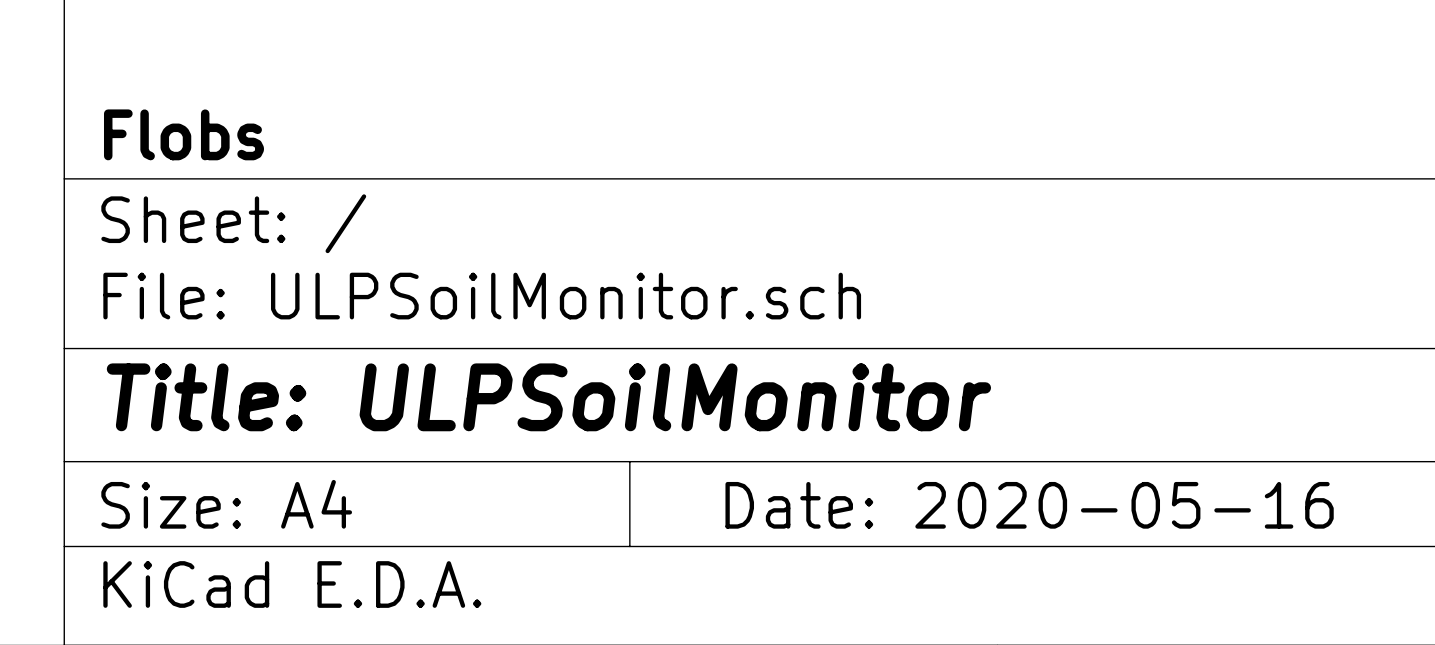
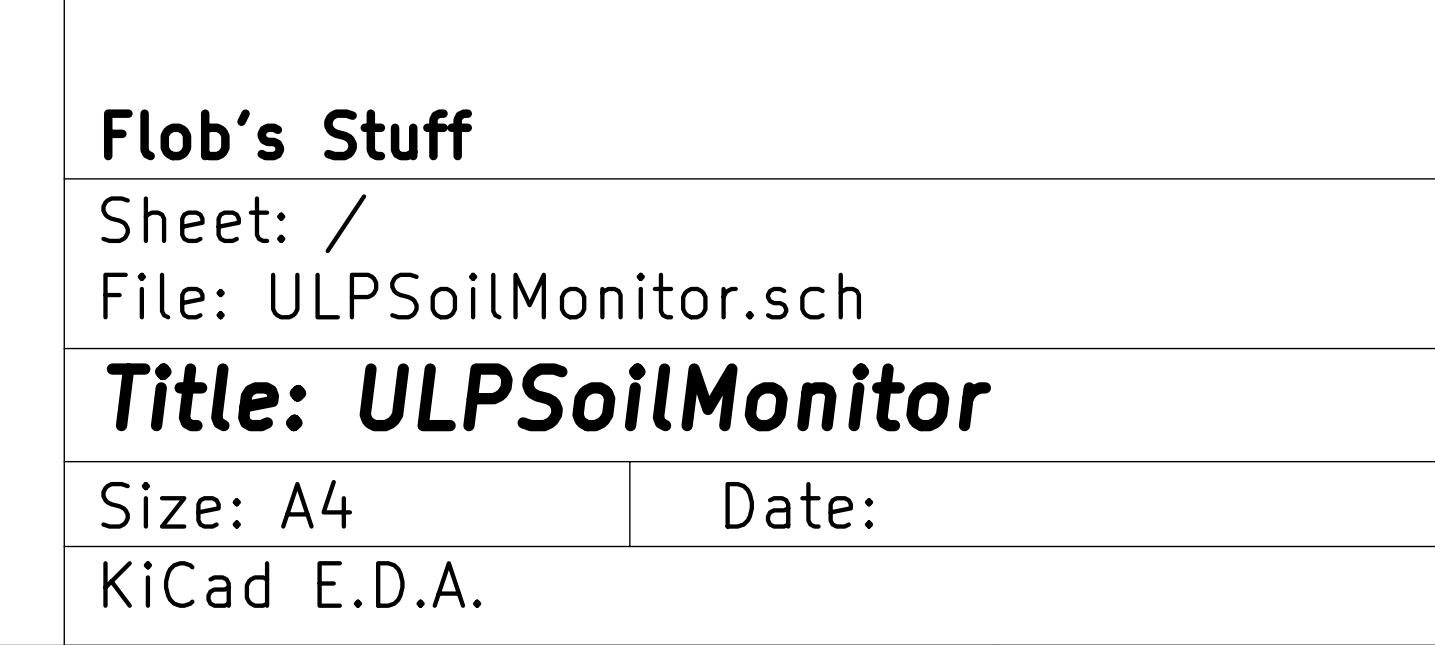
title block: Flobs (183, 134) -> Flob's Stuff (288, 134)
title block: Date: 2020-05-16 (1029, 505) -> Date: (799, 505)

